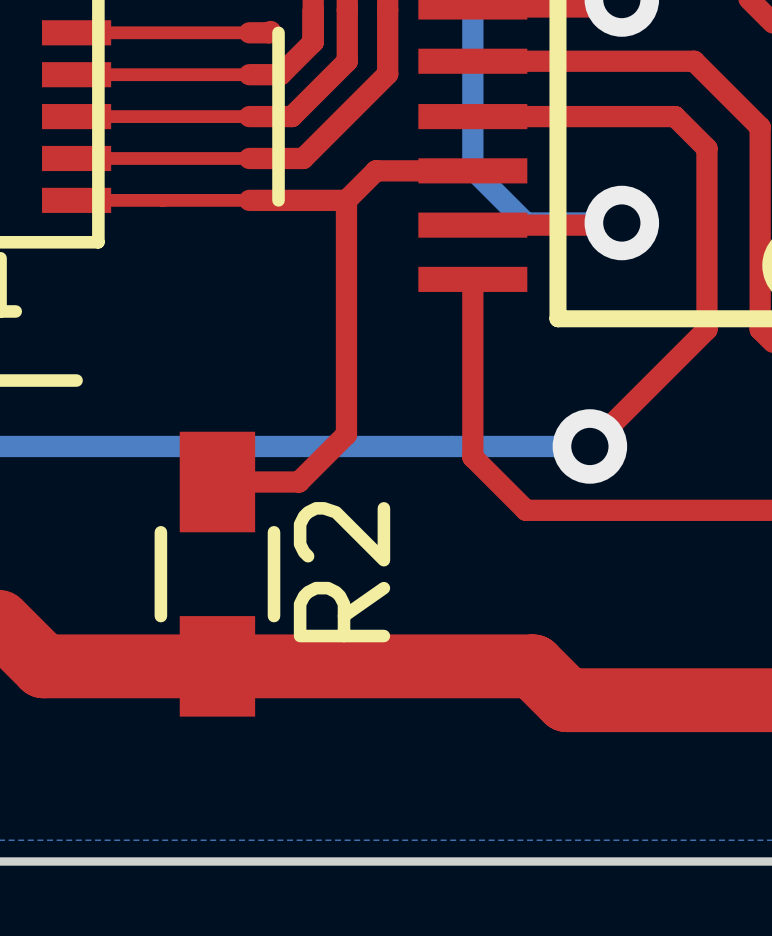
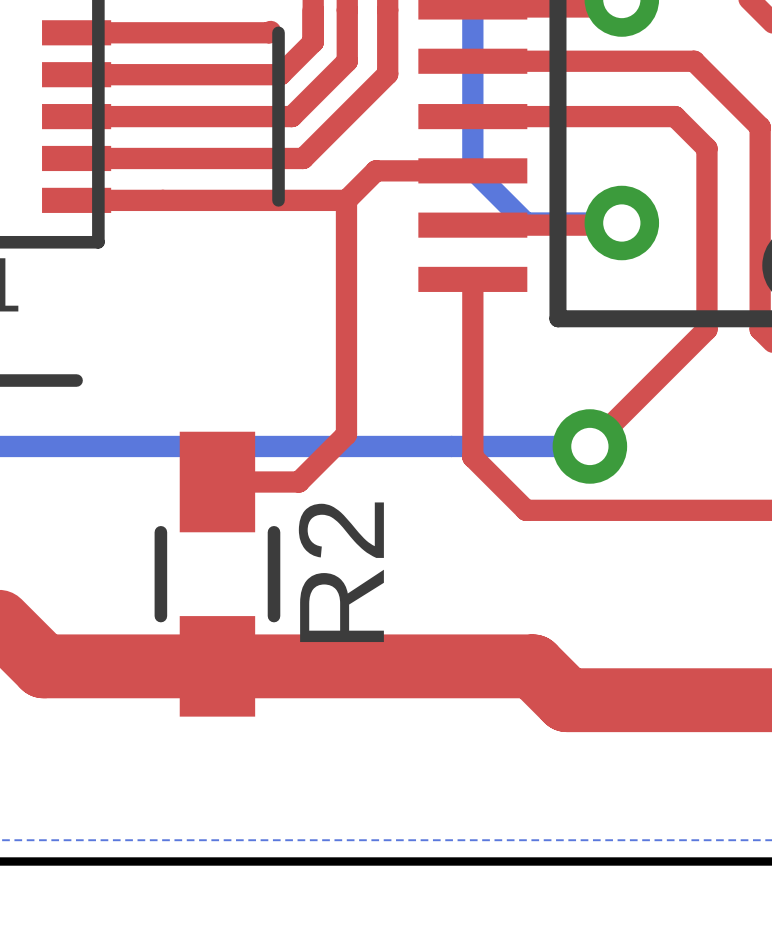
top track width: thin (76, 32) (249, 32) -> thick (76, 32) (249, 32)
top track width: thin (76, 74) (249, 74) -> thick (76, 74) (249, 74)
top track width: thin (76, 116) (249, 116) -> thick (76, 116) (249, 116)
top track width: thin (76, 158) (249, 158) -> thick (76, 158) (249, 158)
top track width: thin (76, 200) (249, 200) -> thick (76, 200) (249, 200)

